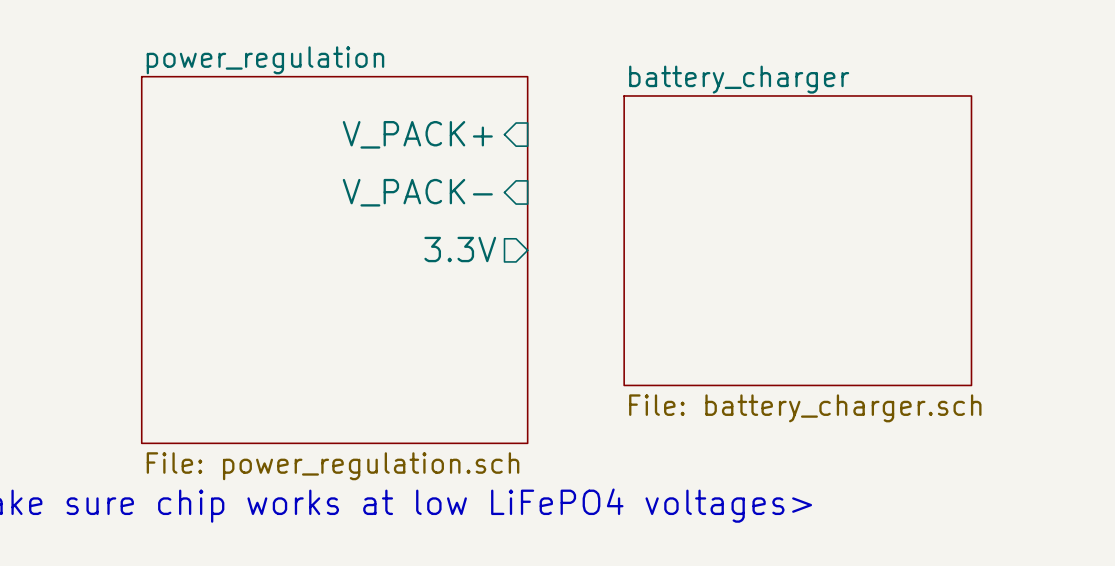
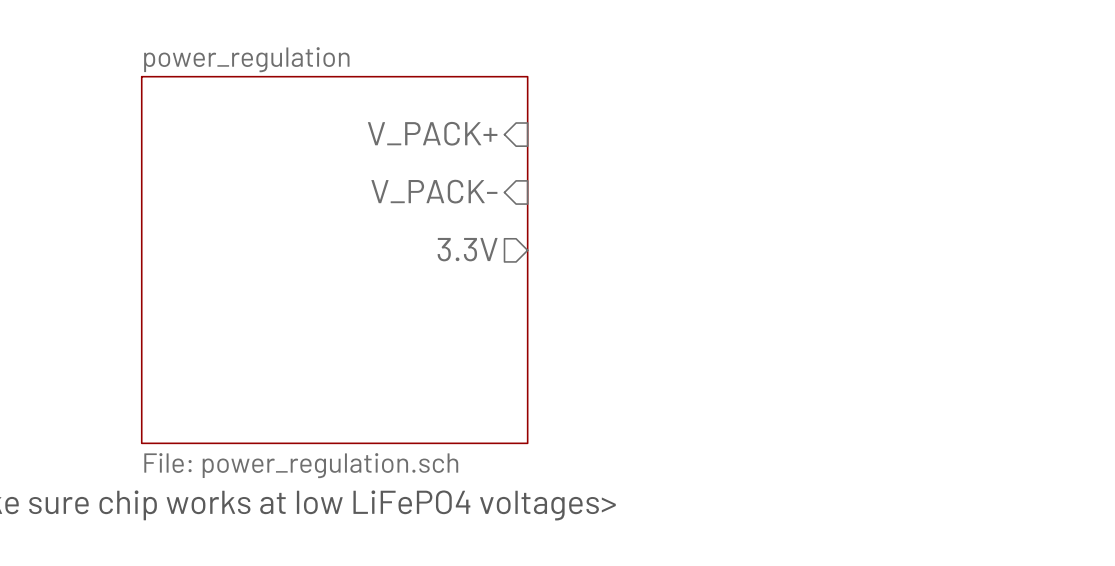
sheet battery_charger: File: battery_charger.sch (797, 240) -> none

